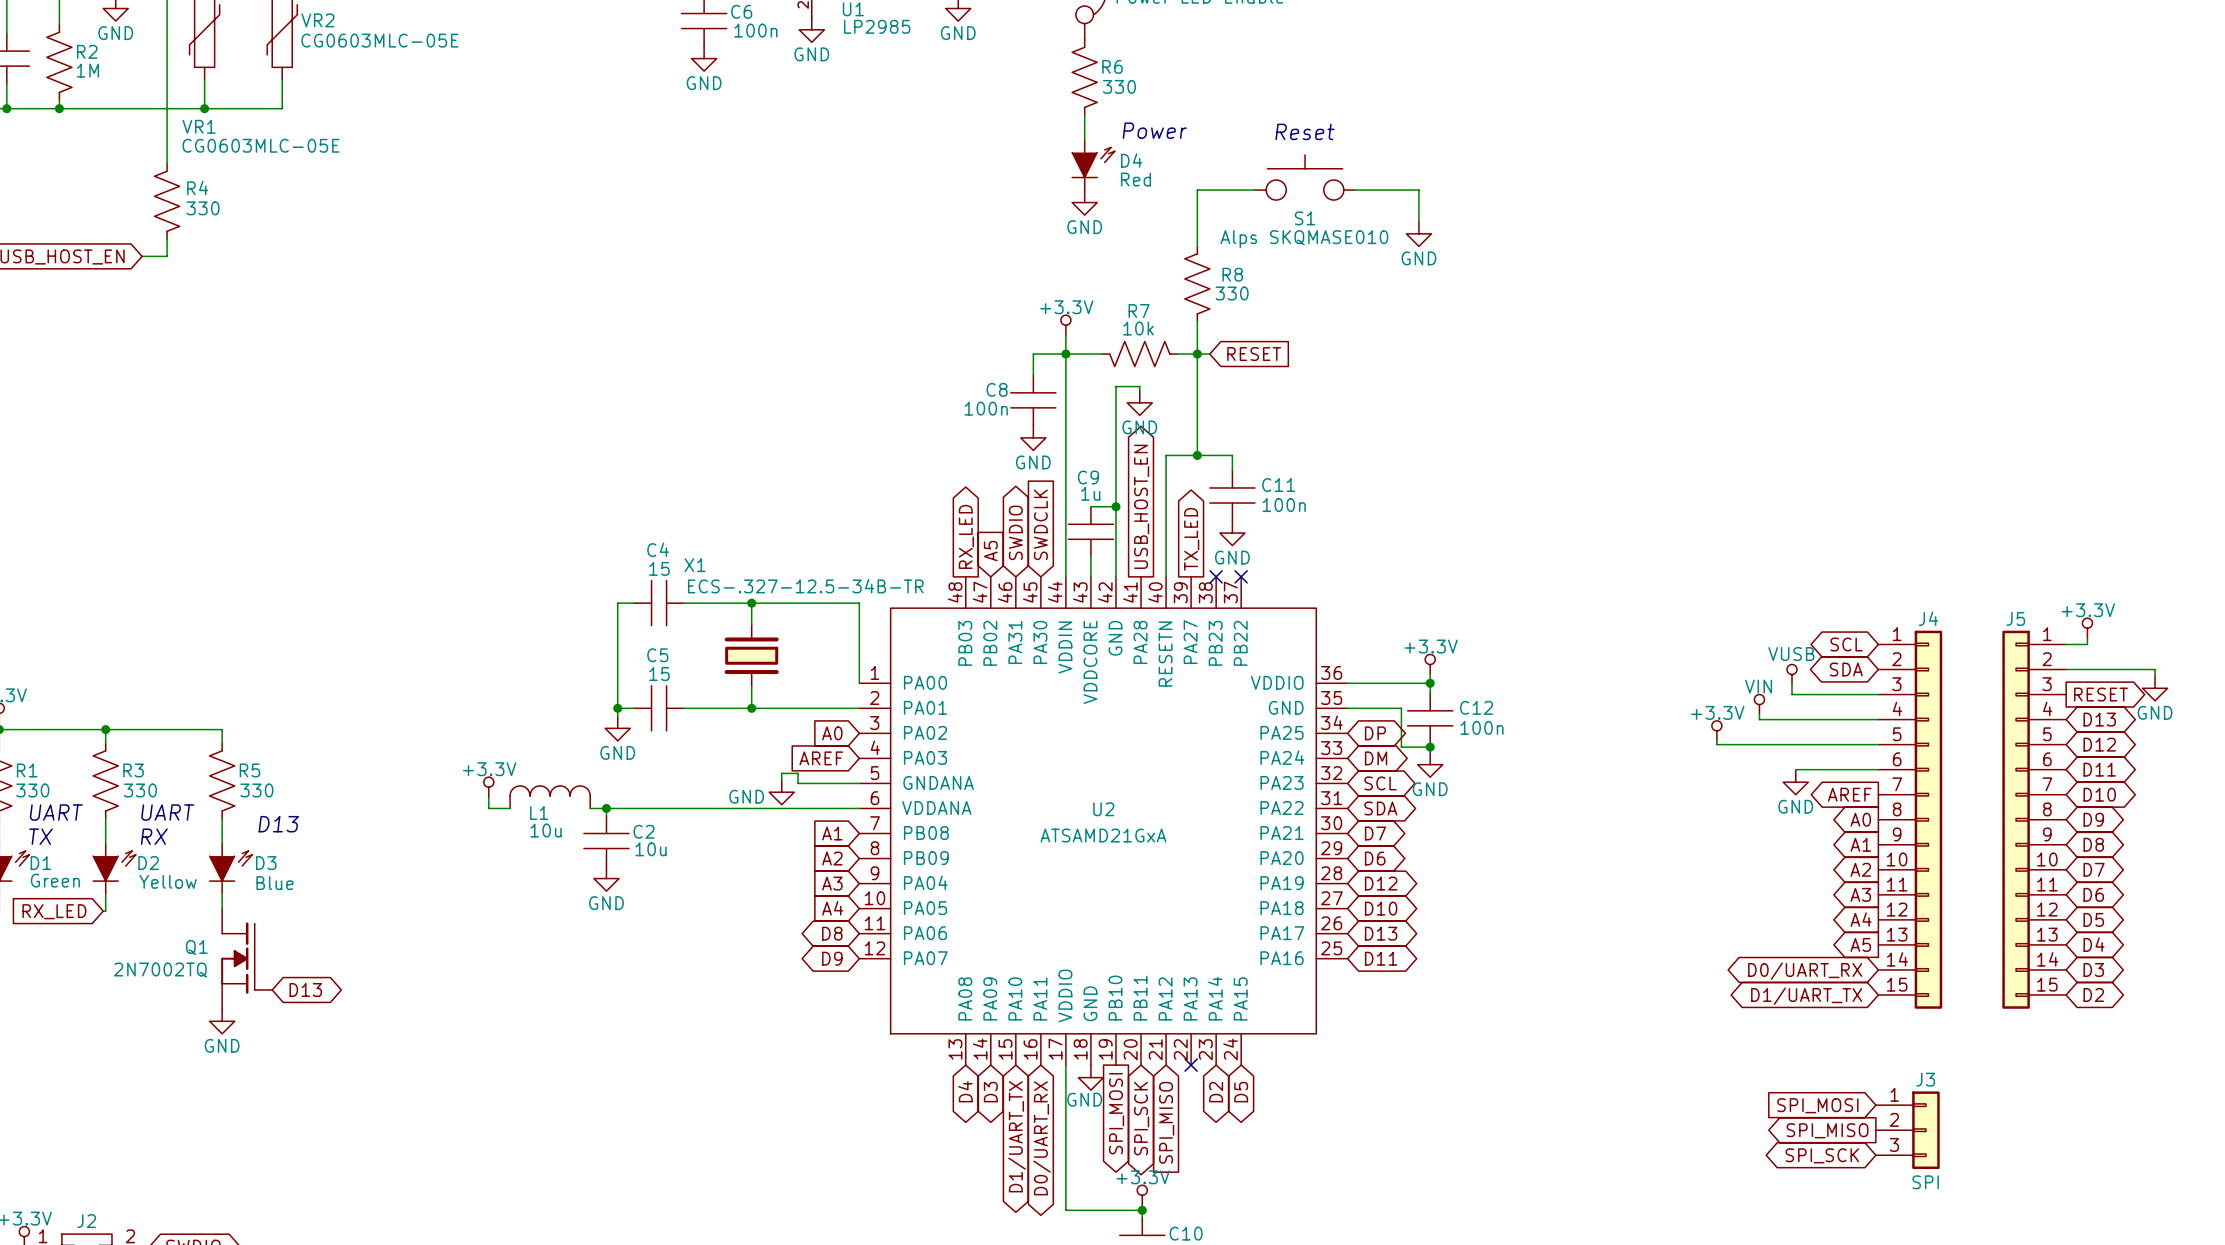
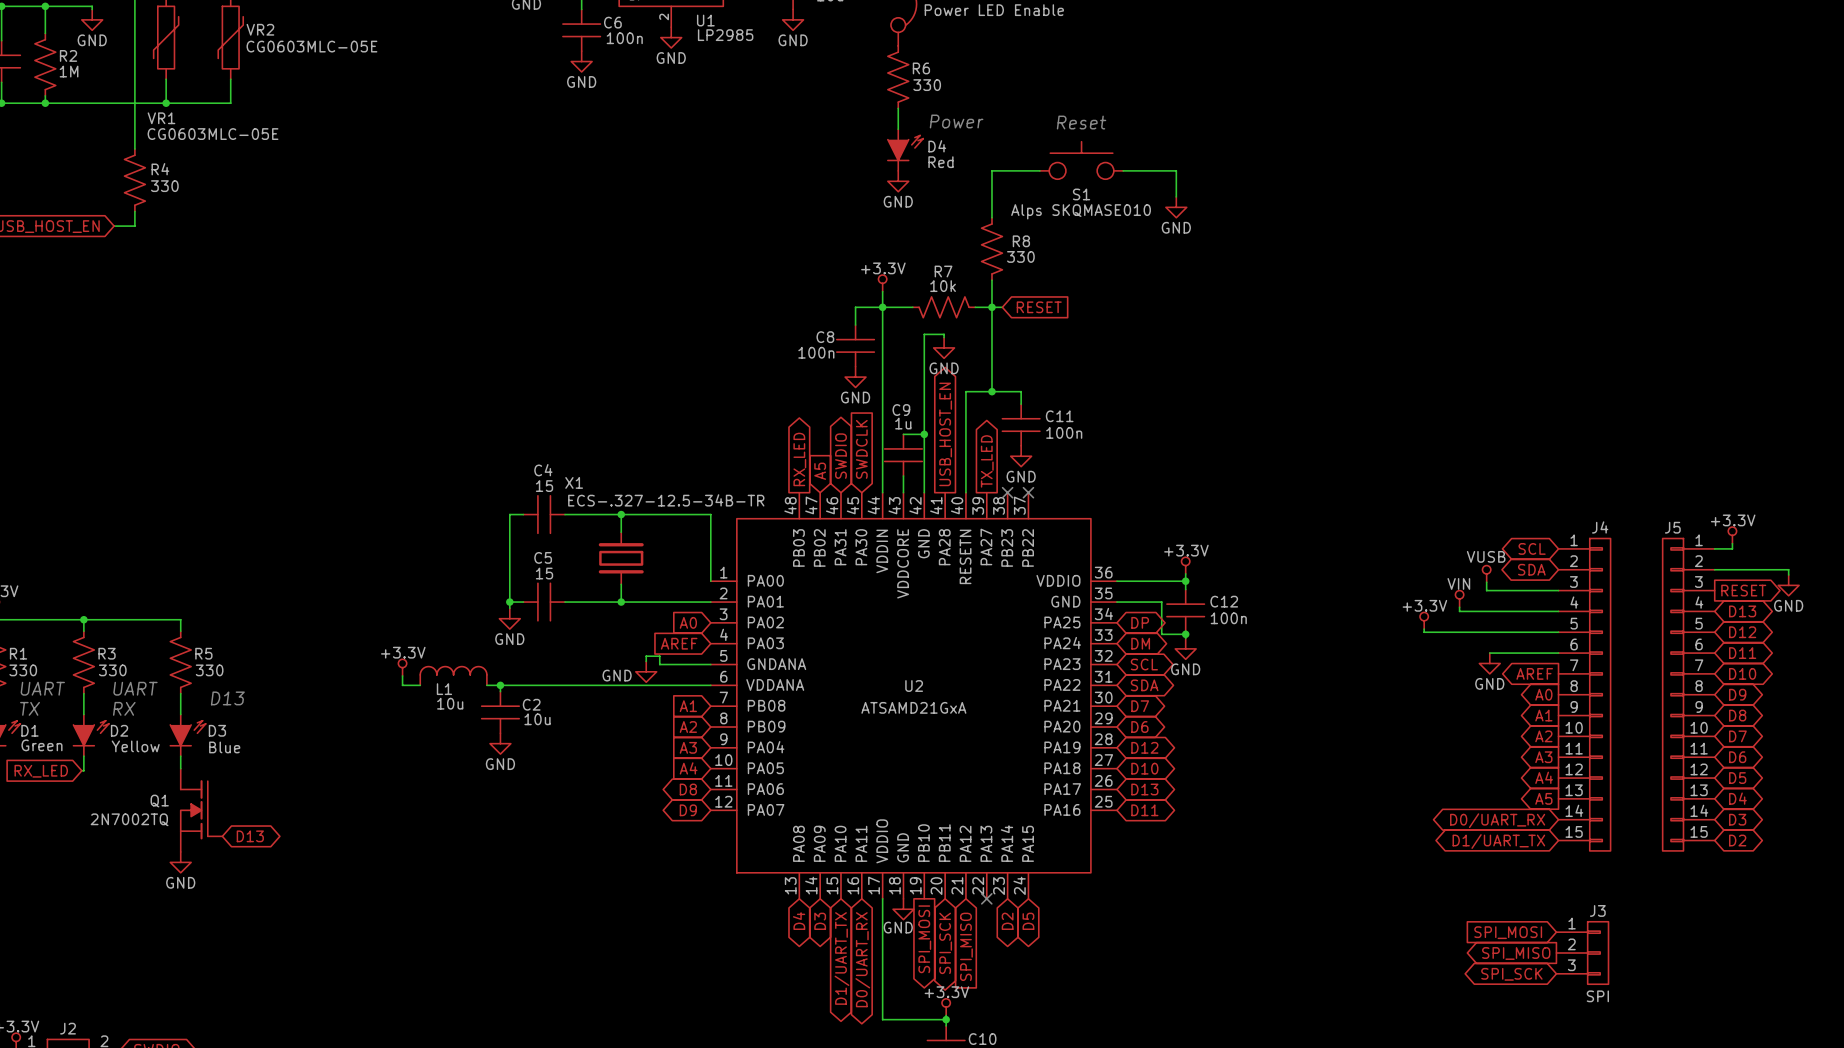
J4 symbol: [1878, 630, 1943, 1009] -> [1558, 538, 1611, 851]
J5 symbol: [2002, 630, 2067, 1009] -> [1662, 538, 1715, 851]
J3 symbol: [1875, 1091, 1940, 1170] -> [1556, 921, 1609, 985]

